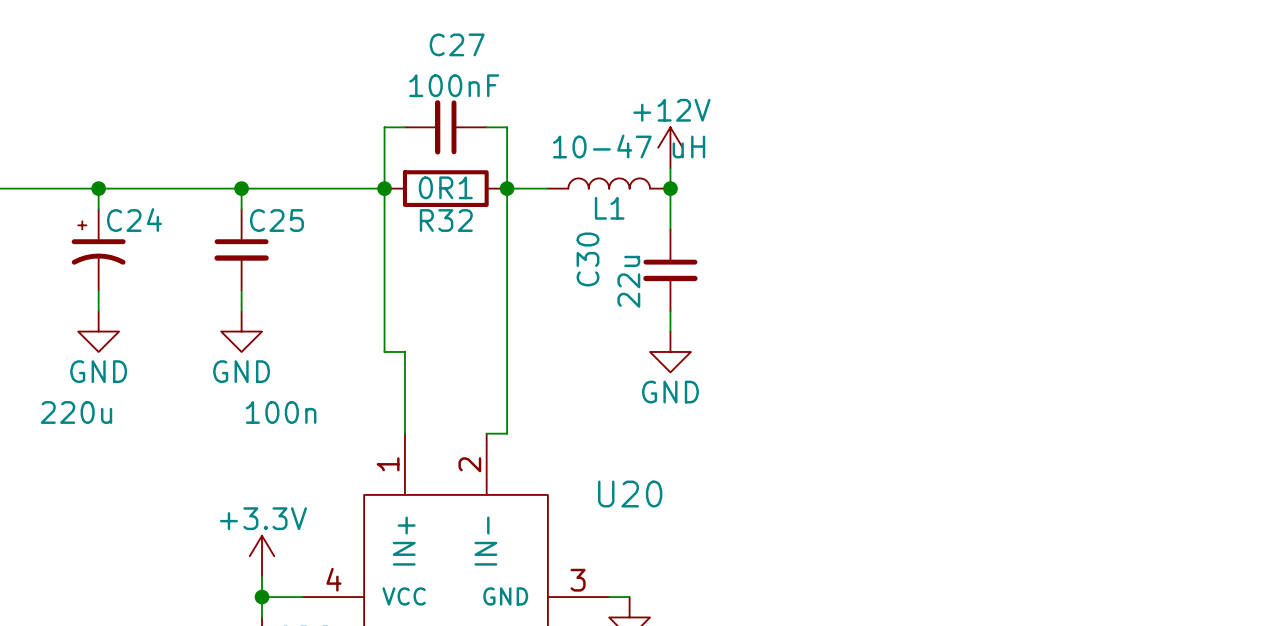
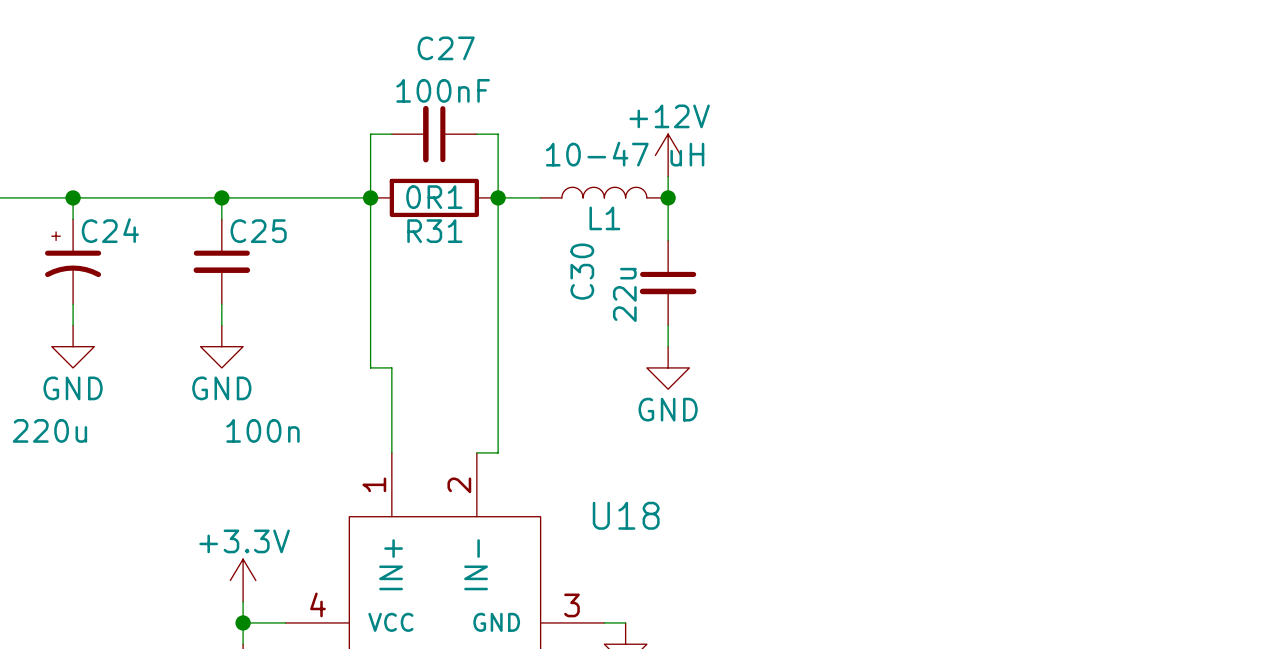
R32 name: R32 (446, 220) -> R31 (434, 231)
U20 name: U20 (630, 494) -> U18 (626, 515)

